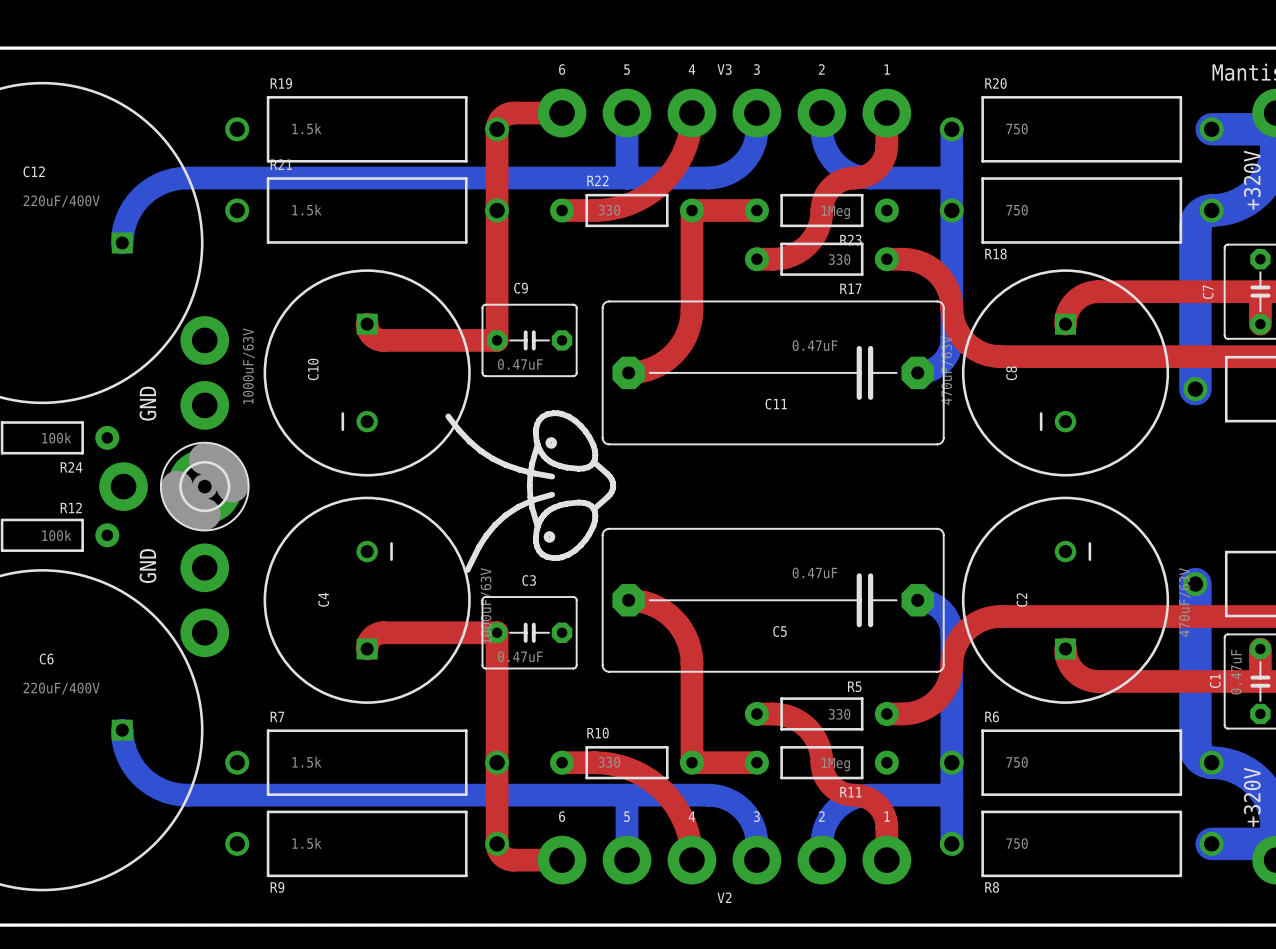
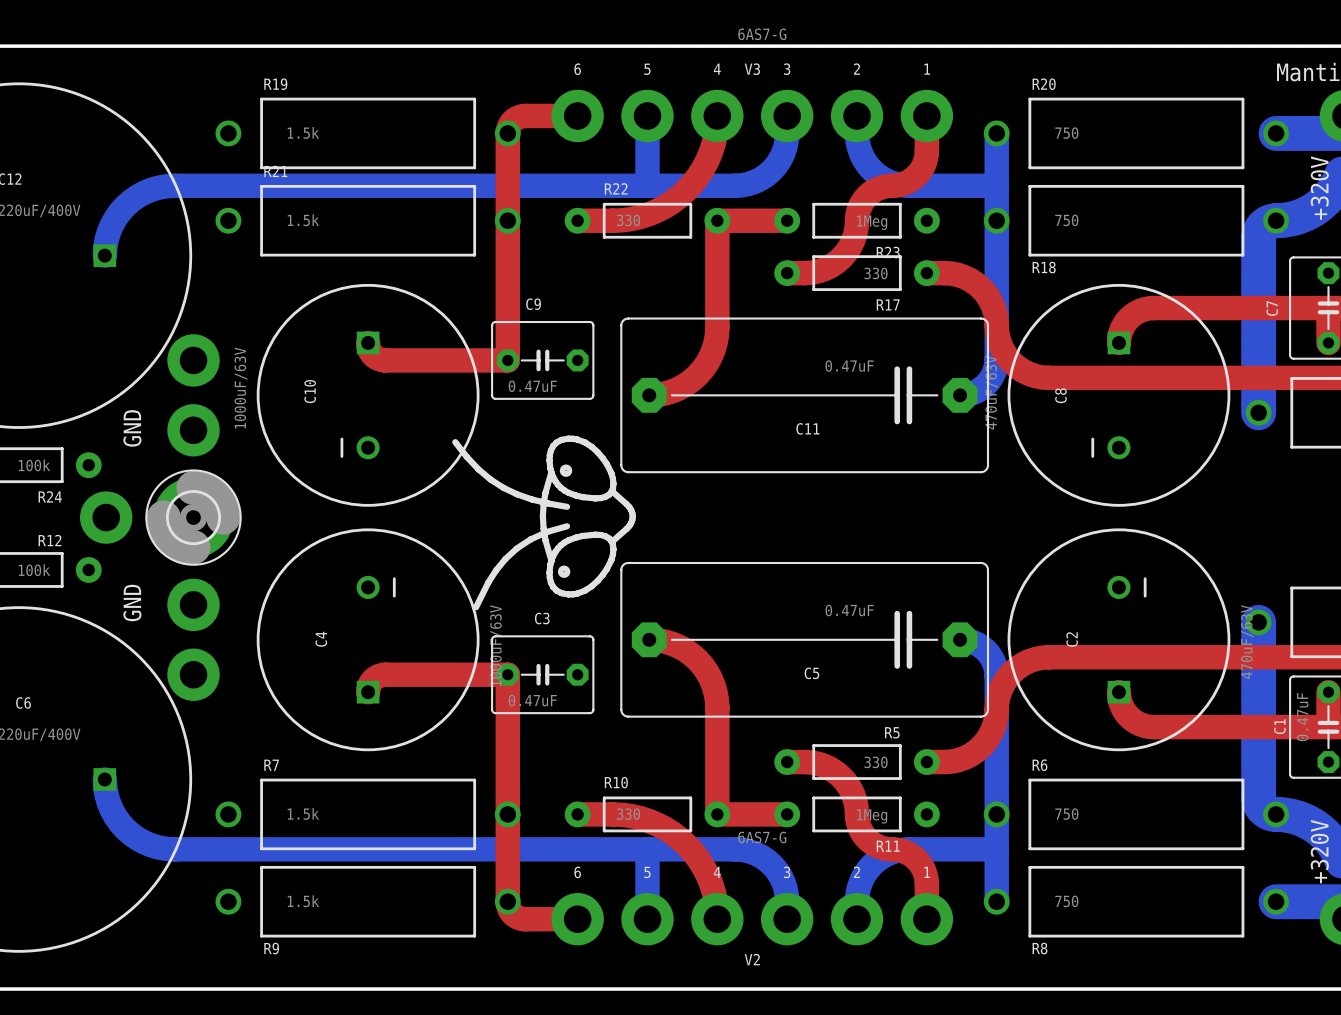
V3 value: none -> 6AS7-G (762, 34)
V2 value: none -> 6AS7-G (762, 837)

